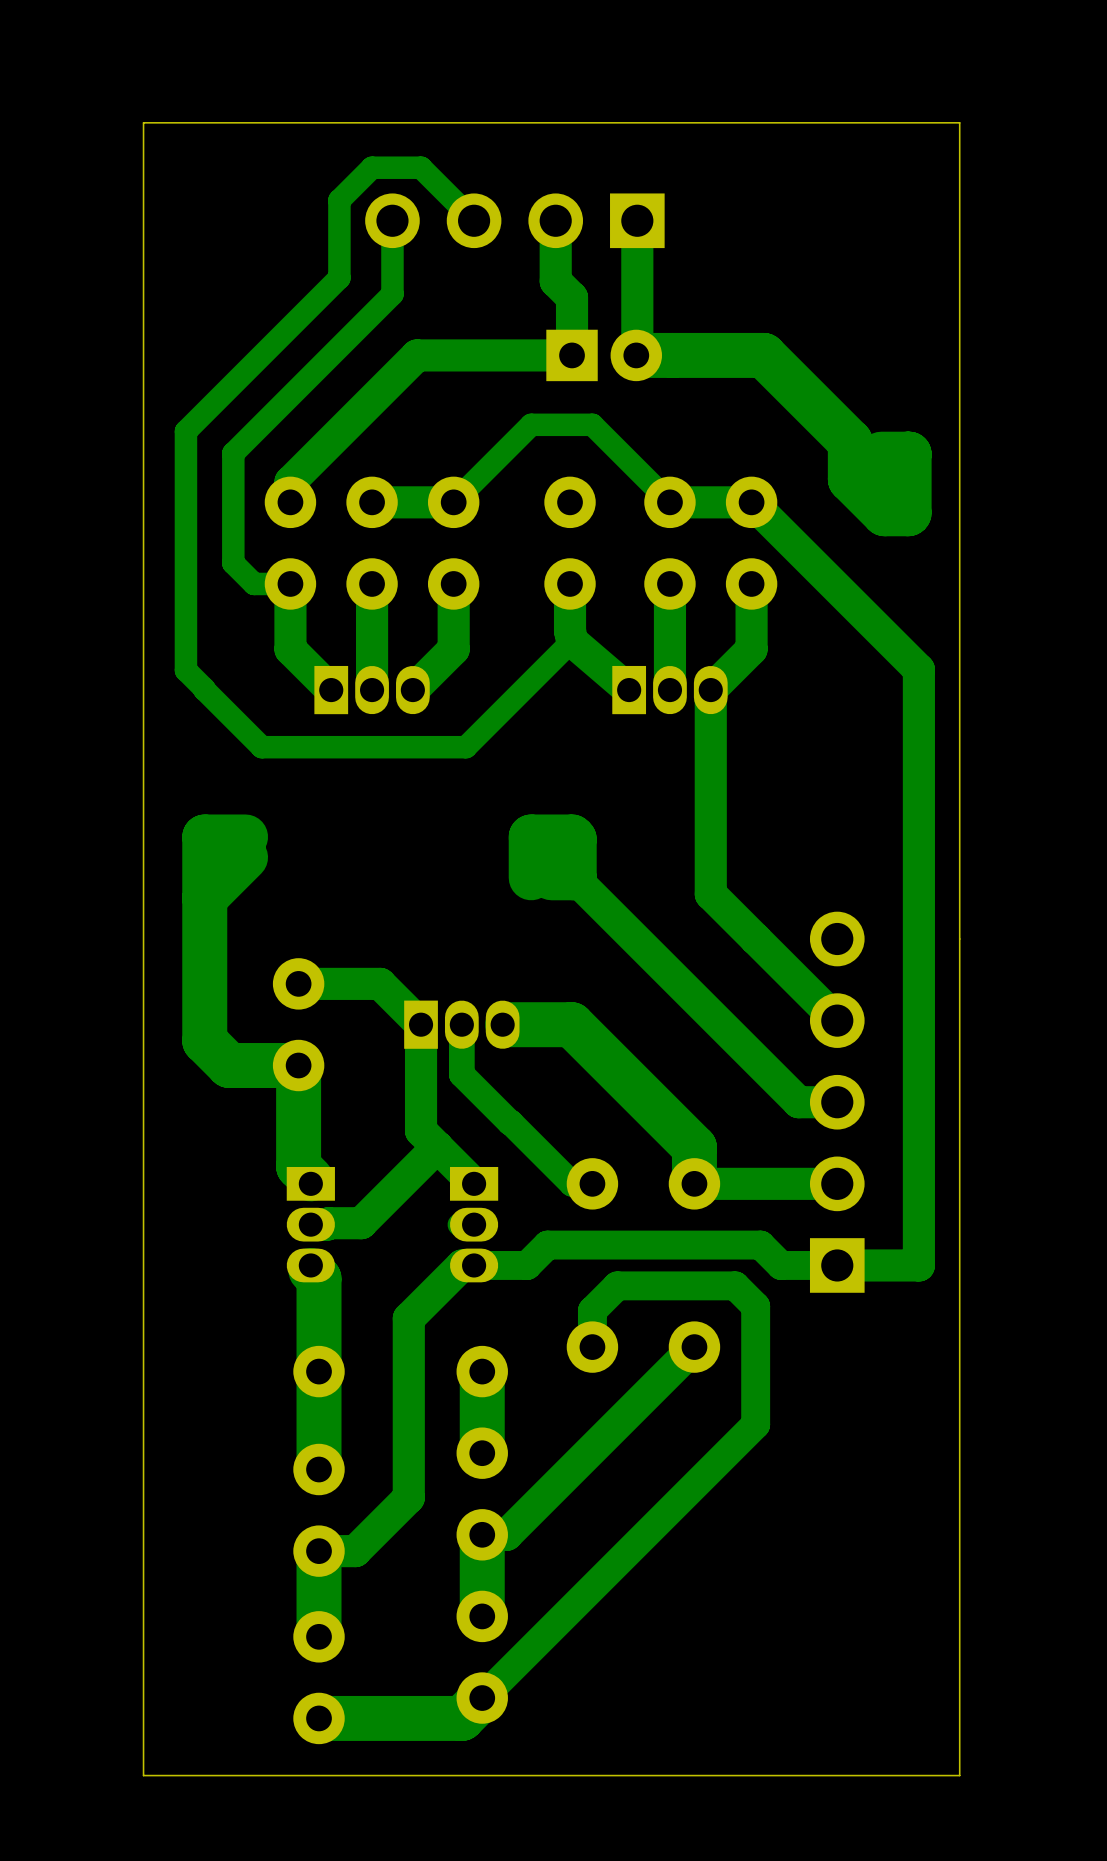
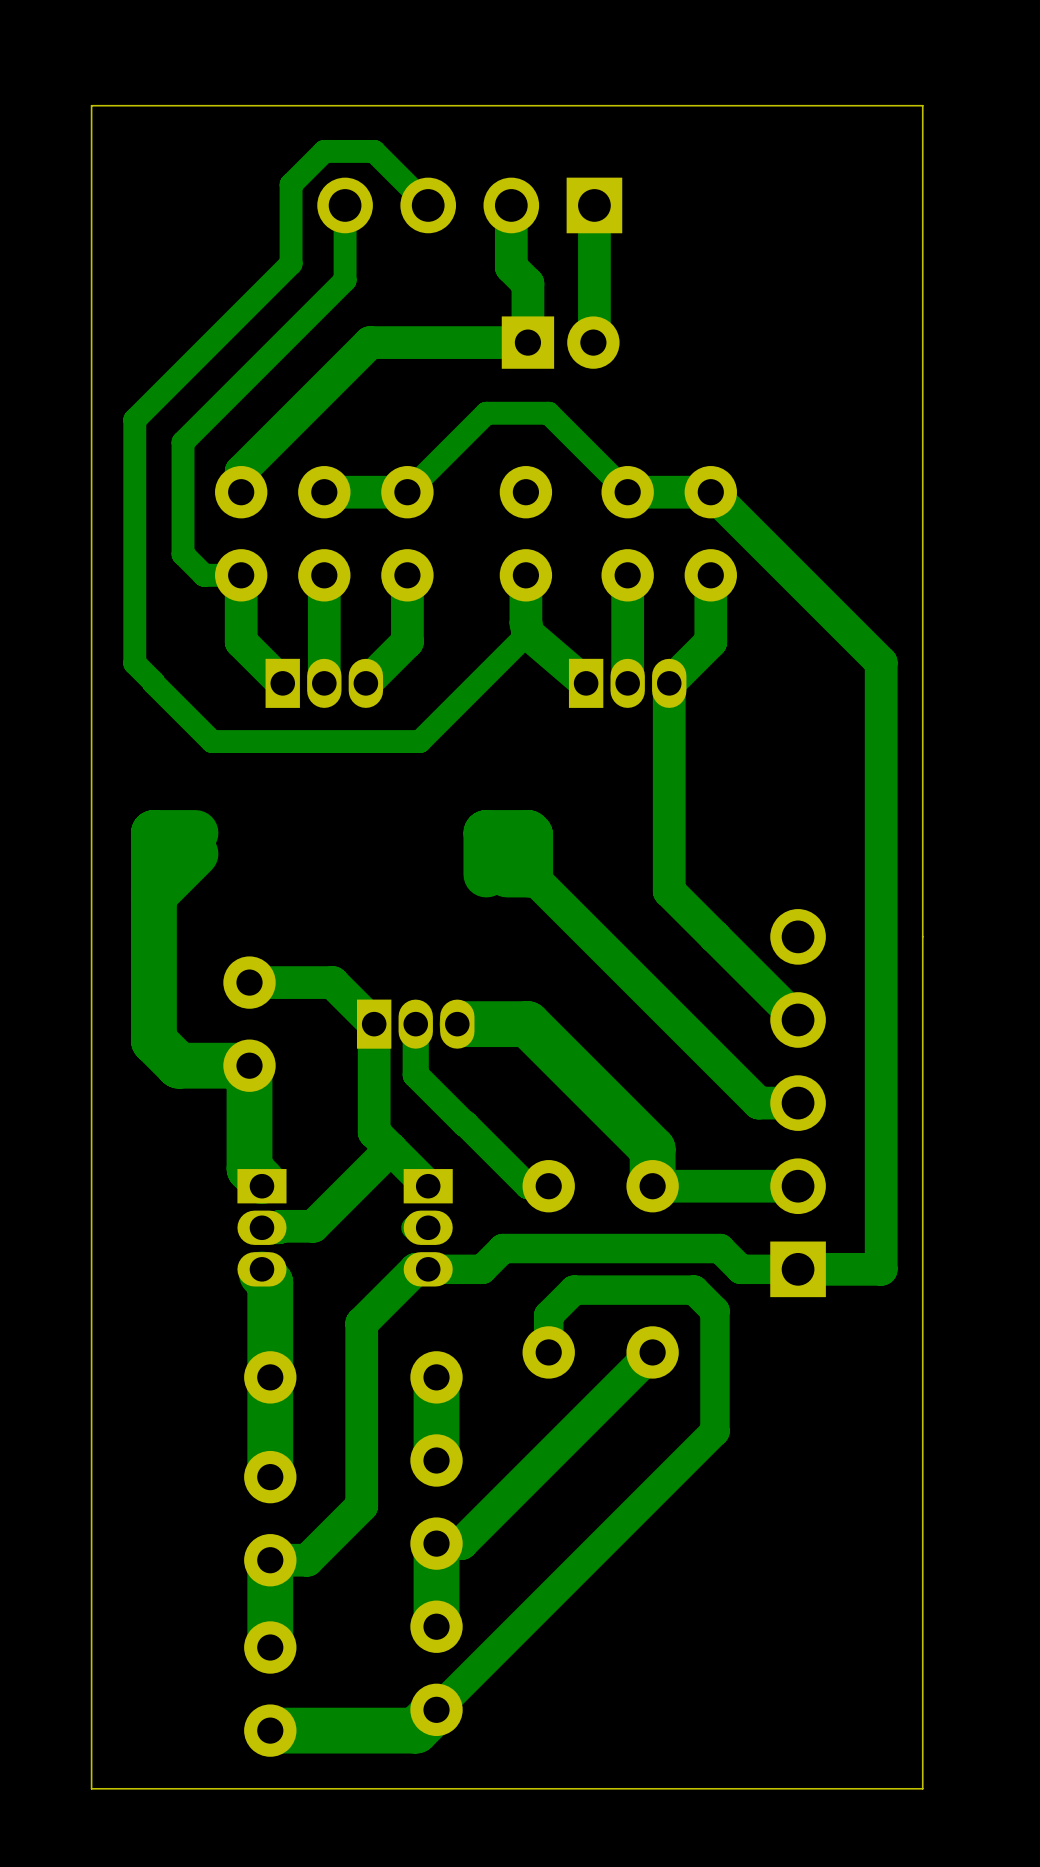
track: (636, 355) (763, 355) (850, 441) (850, 479) (884, 513) (908, 513) (909, 454) (881, 454) -> none

